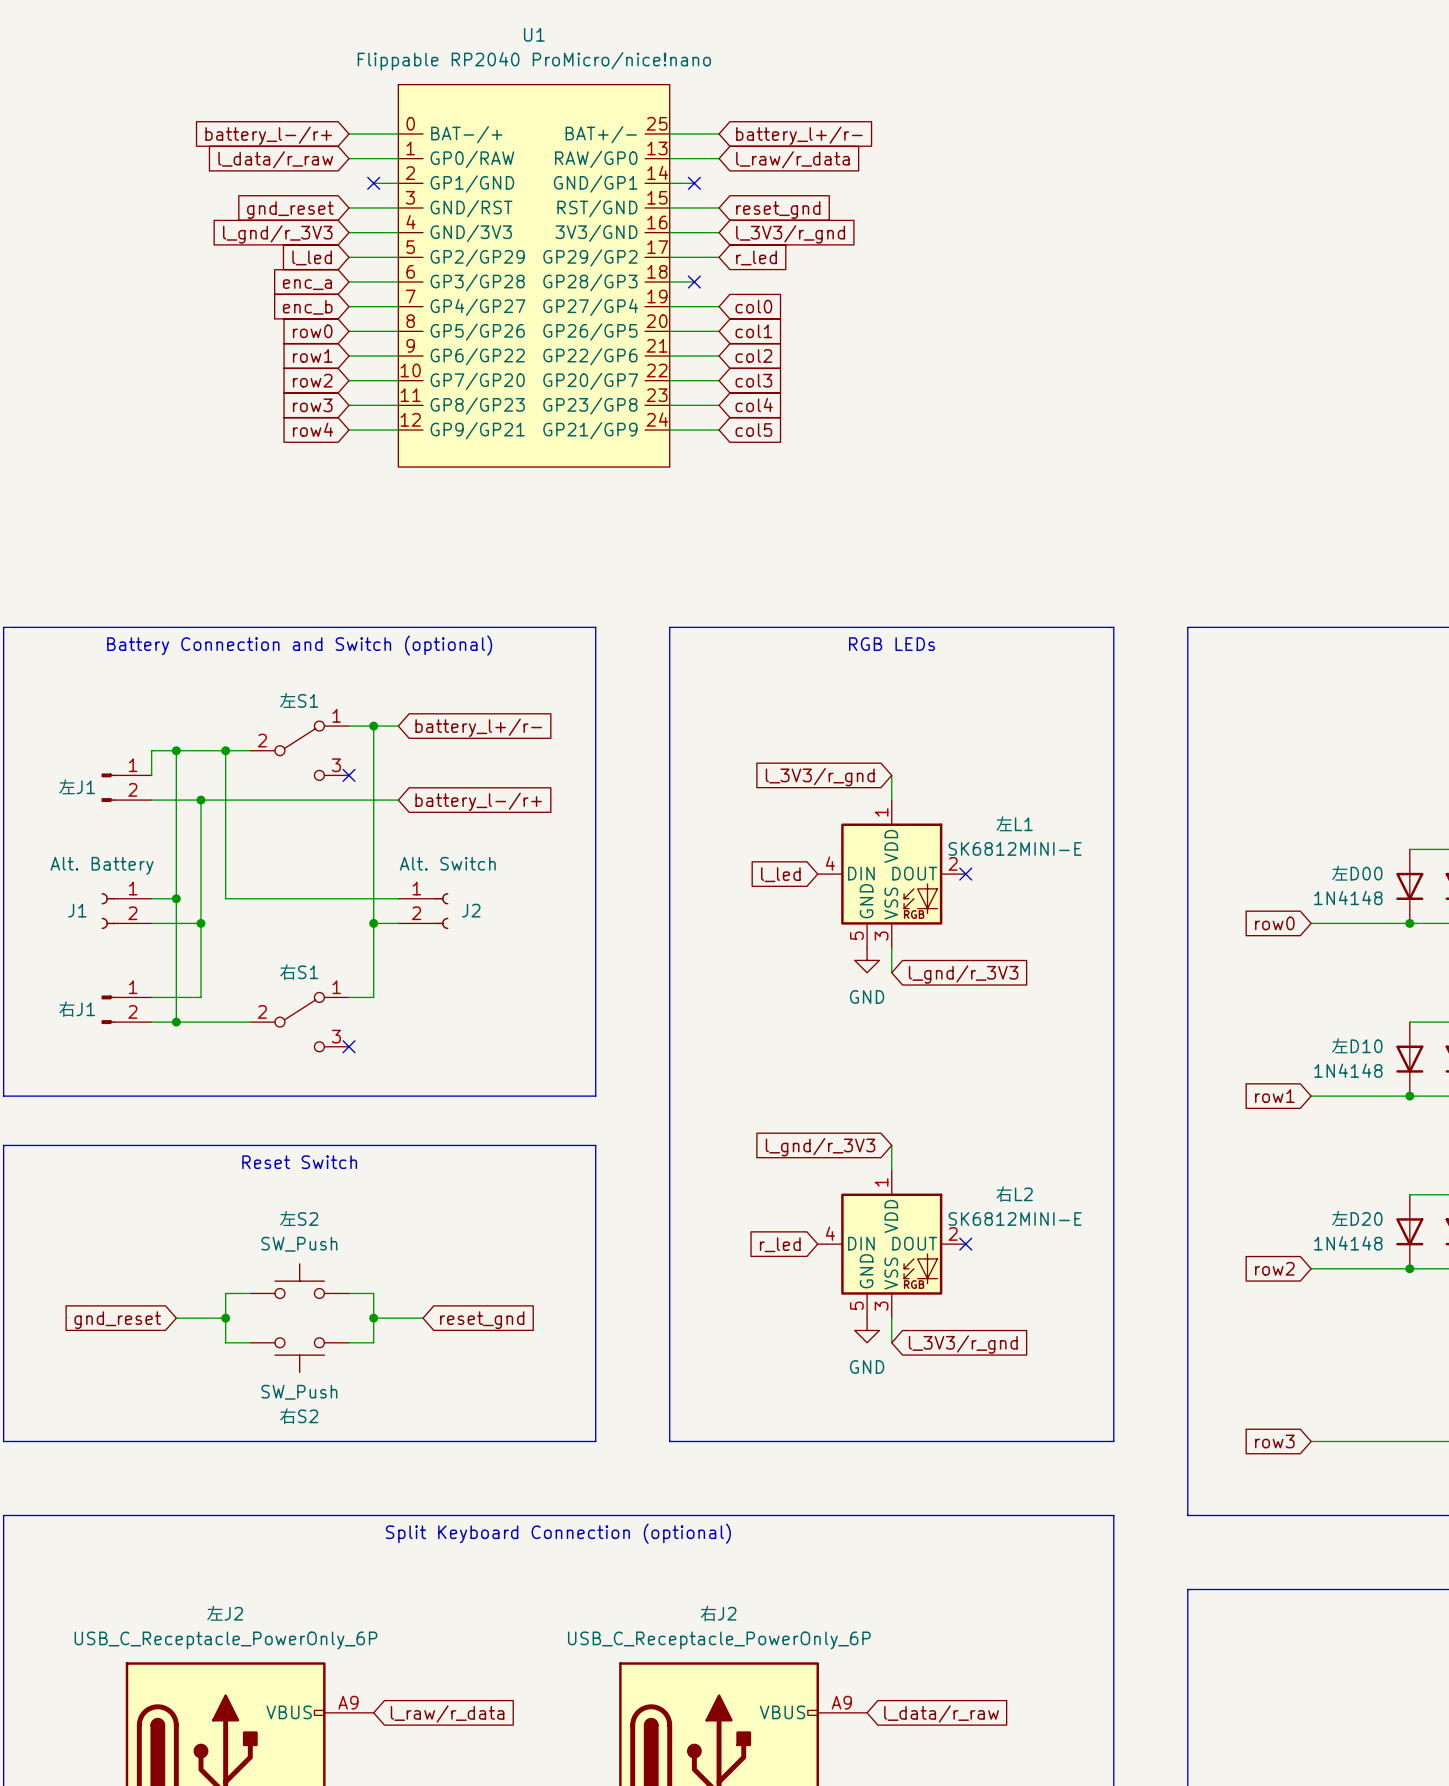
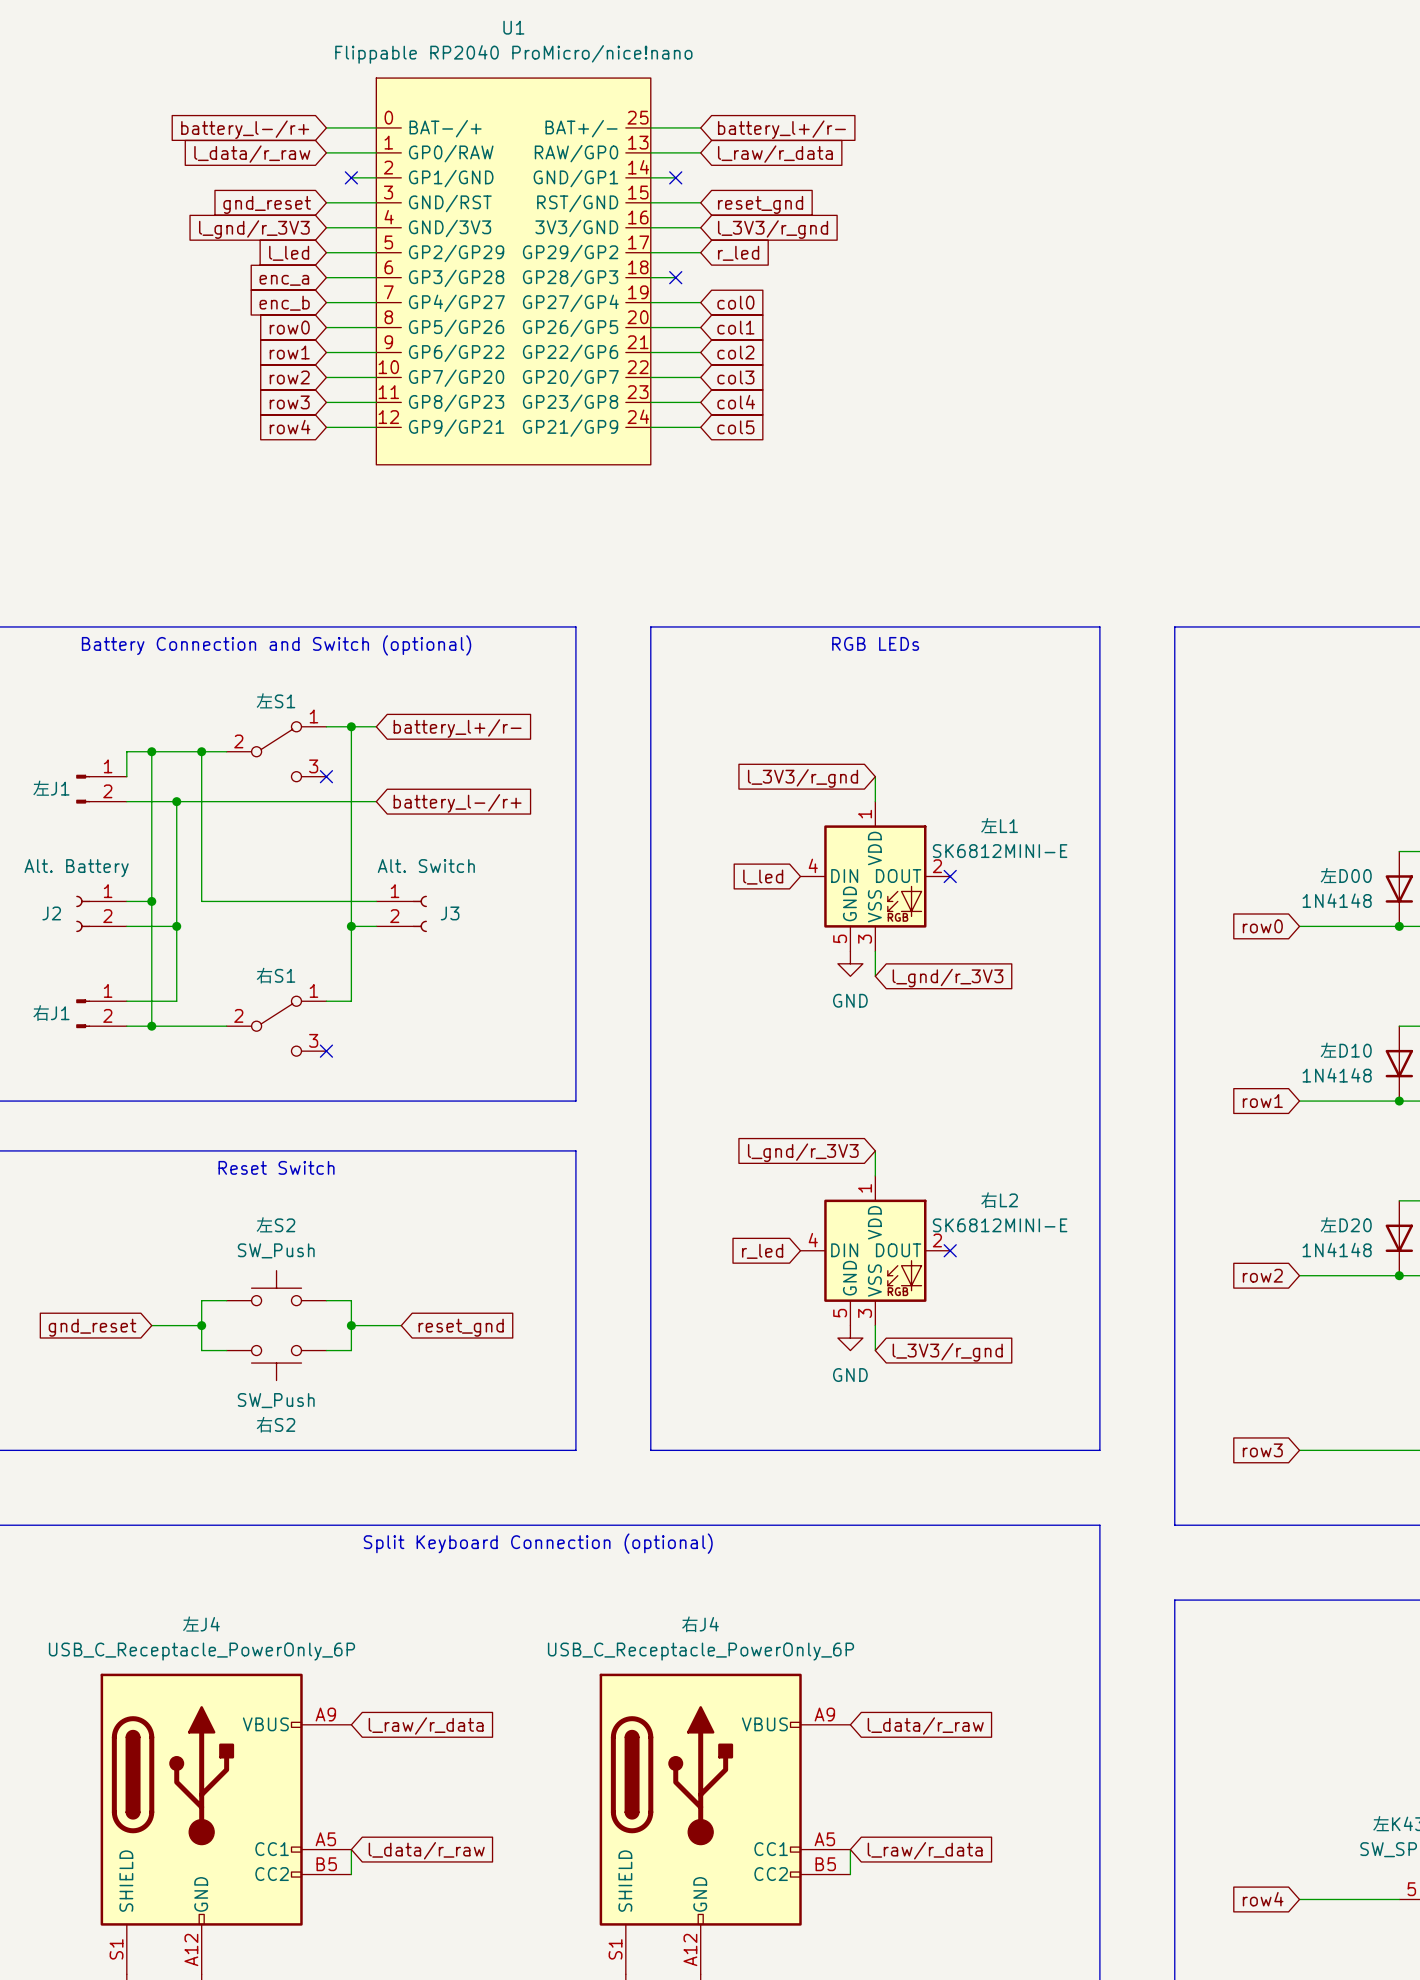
J1 name: J1 (77, 910) -> J2 (51, 913)
J2 name: J2 (471, 910) -> J3 (450, 913)
左J2 name: 左J2 (224, 1613) -> 左J4 (201, 1624)
右J2 name: 右J2 (718, 1613) -> 右J4 (700, 1624)

